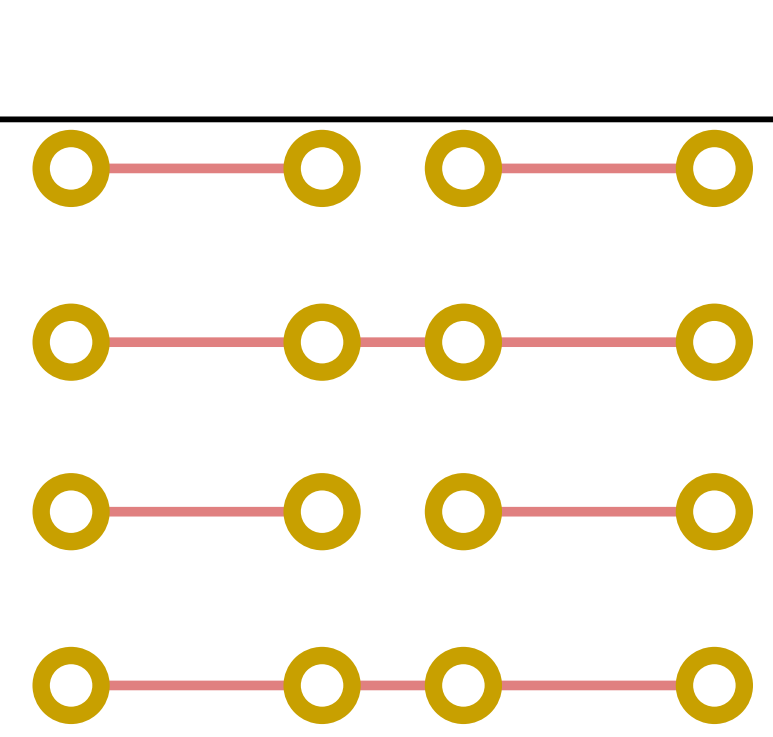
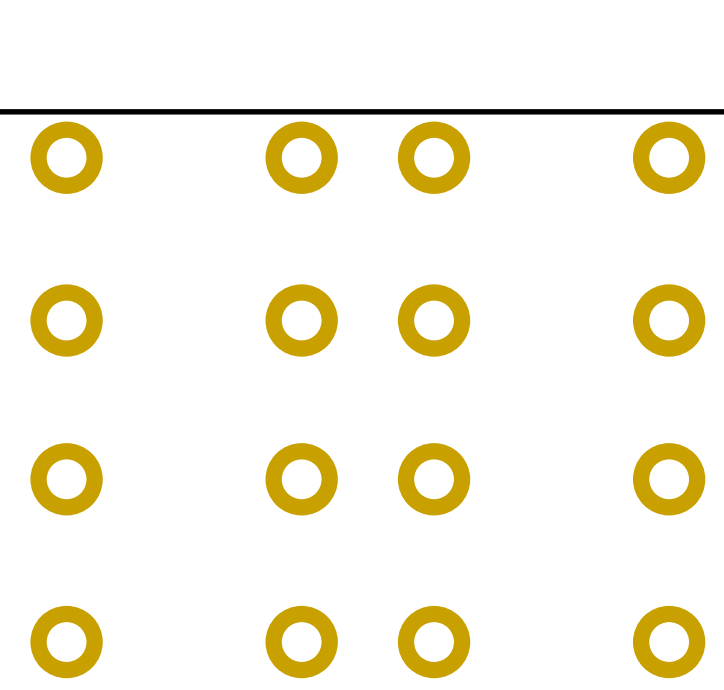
top track: (322, 168) (71, 168) -> none
top track: (714, 168) (463, 168) -> none
top track: (714, 342) (71, 342) -> none
top track: (322, 511) (71, 511) -> none
top track: (714, 511) (463, 511) -> none
top track: (714, 685) (71, 685) -> none

